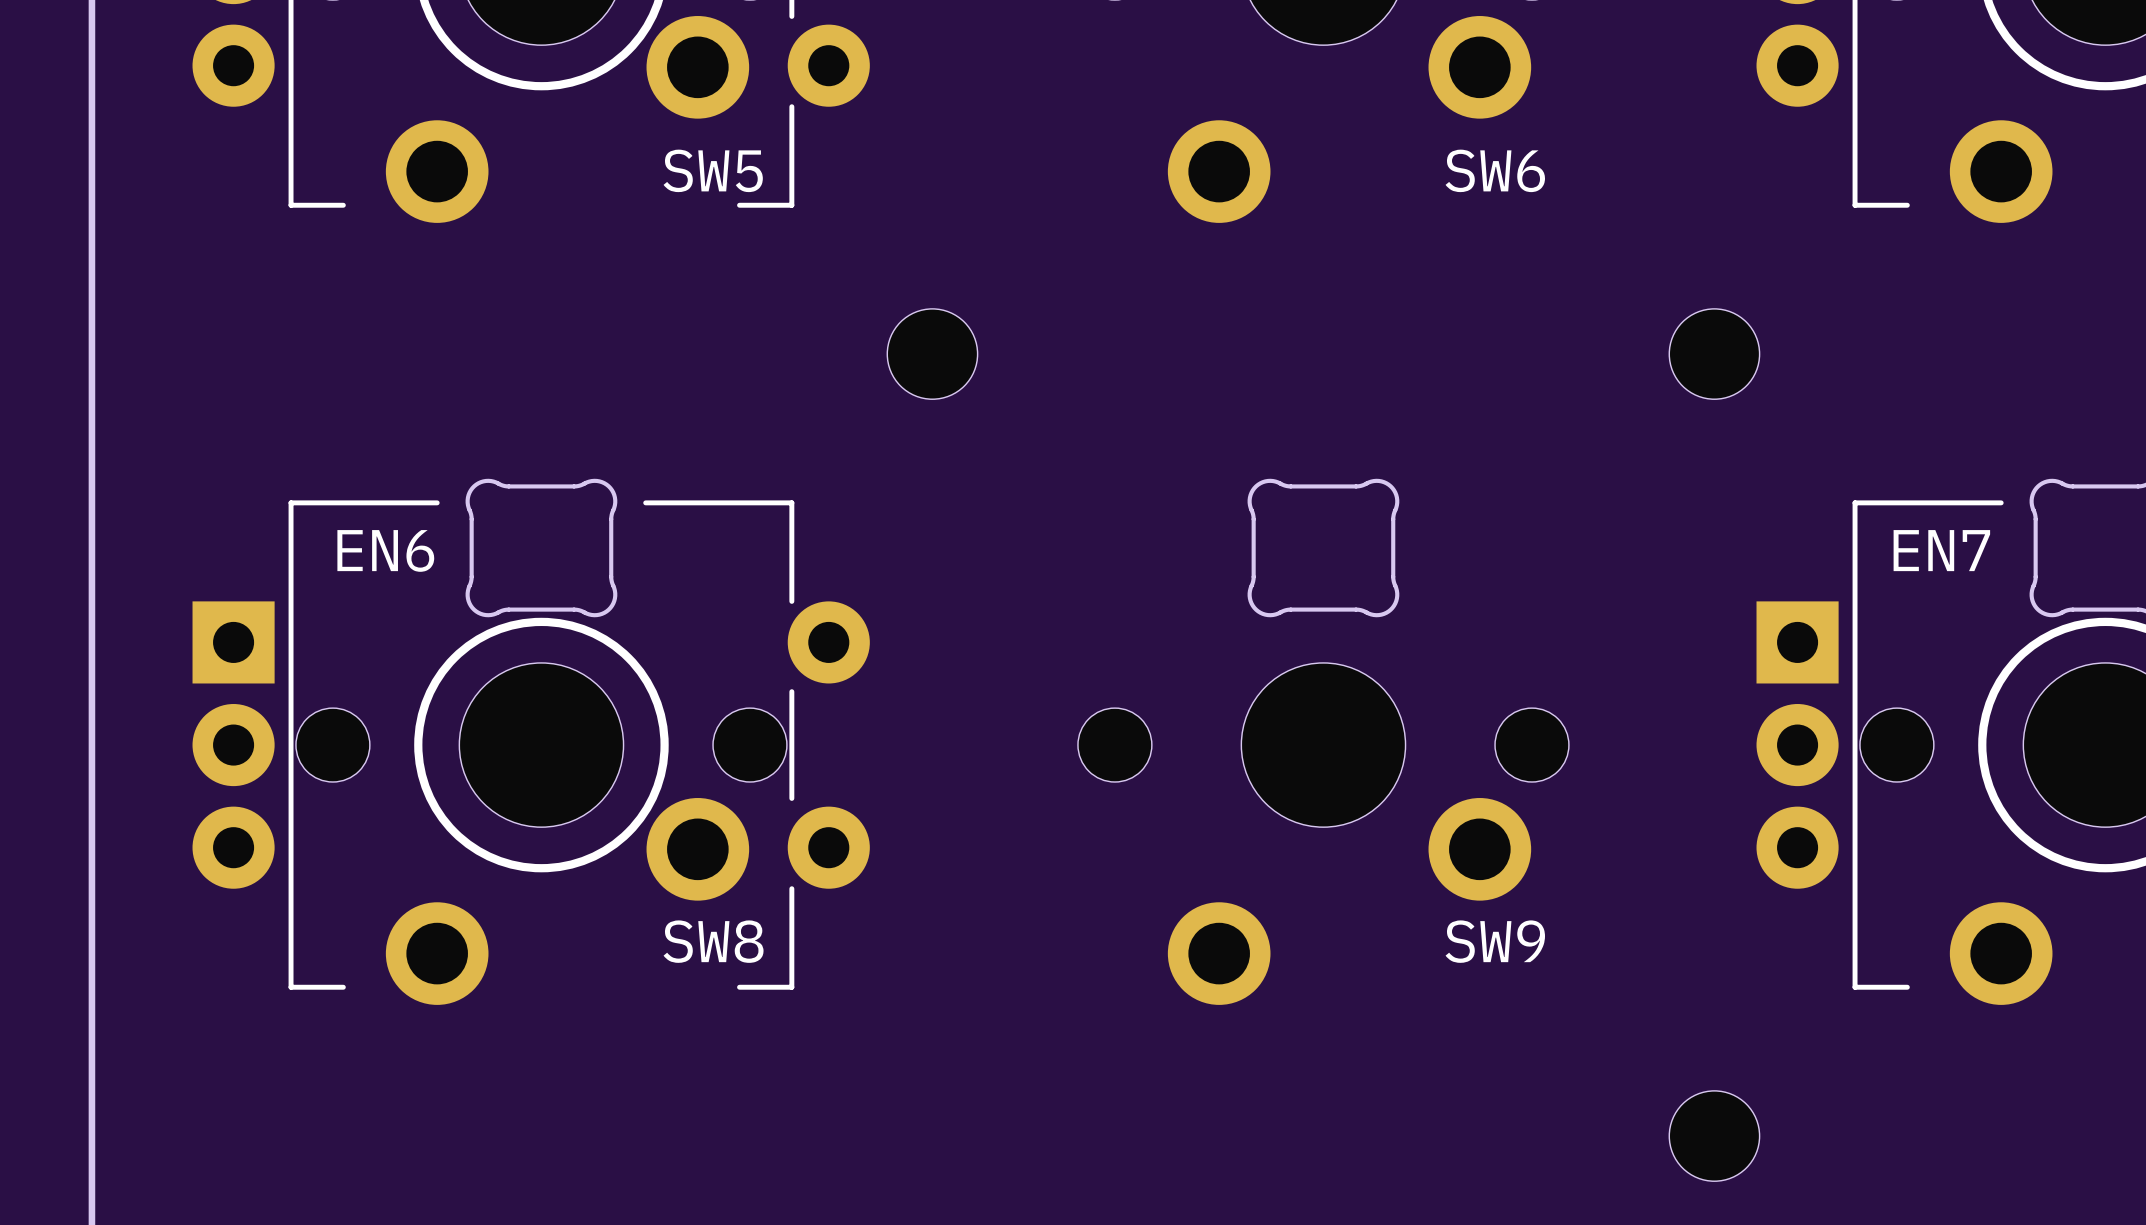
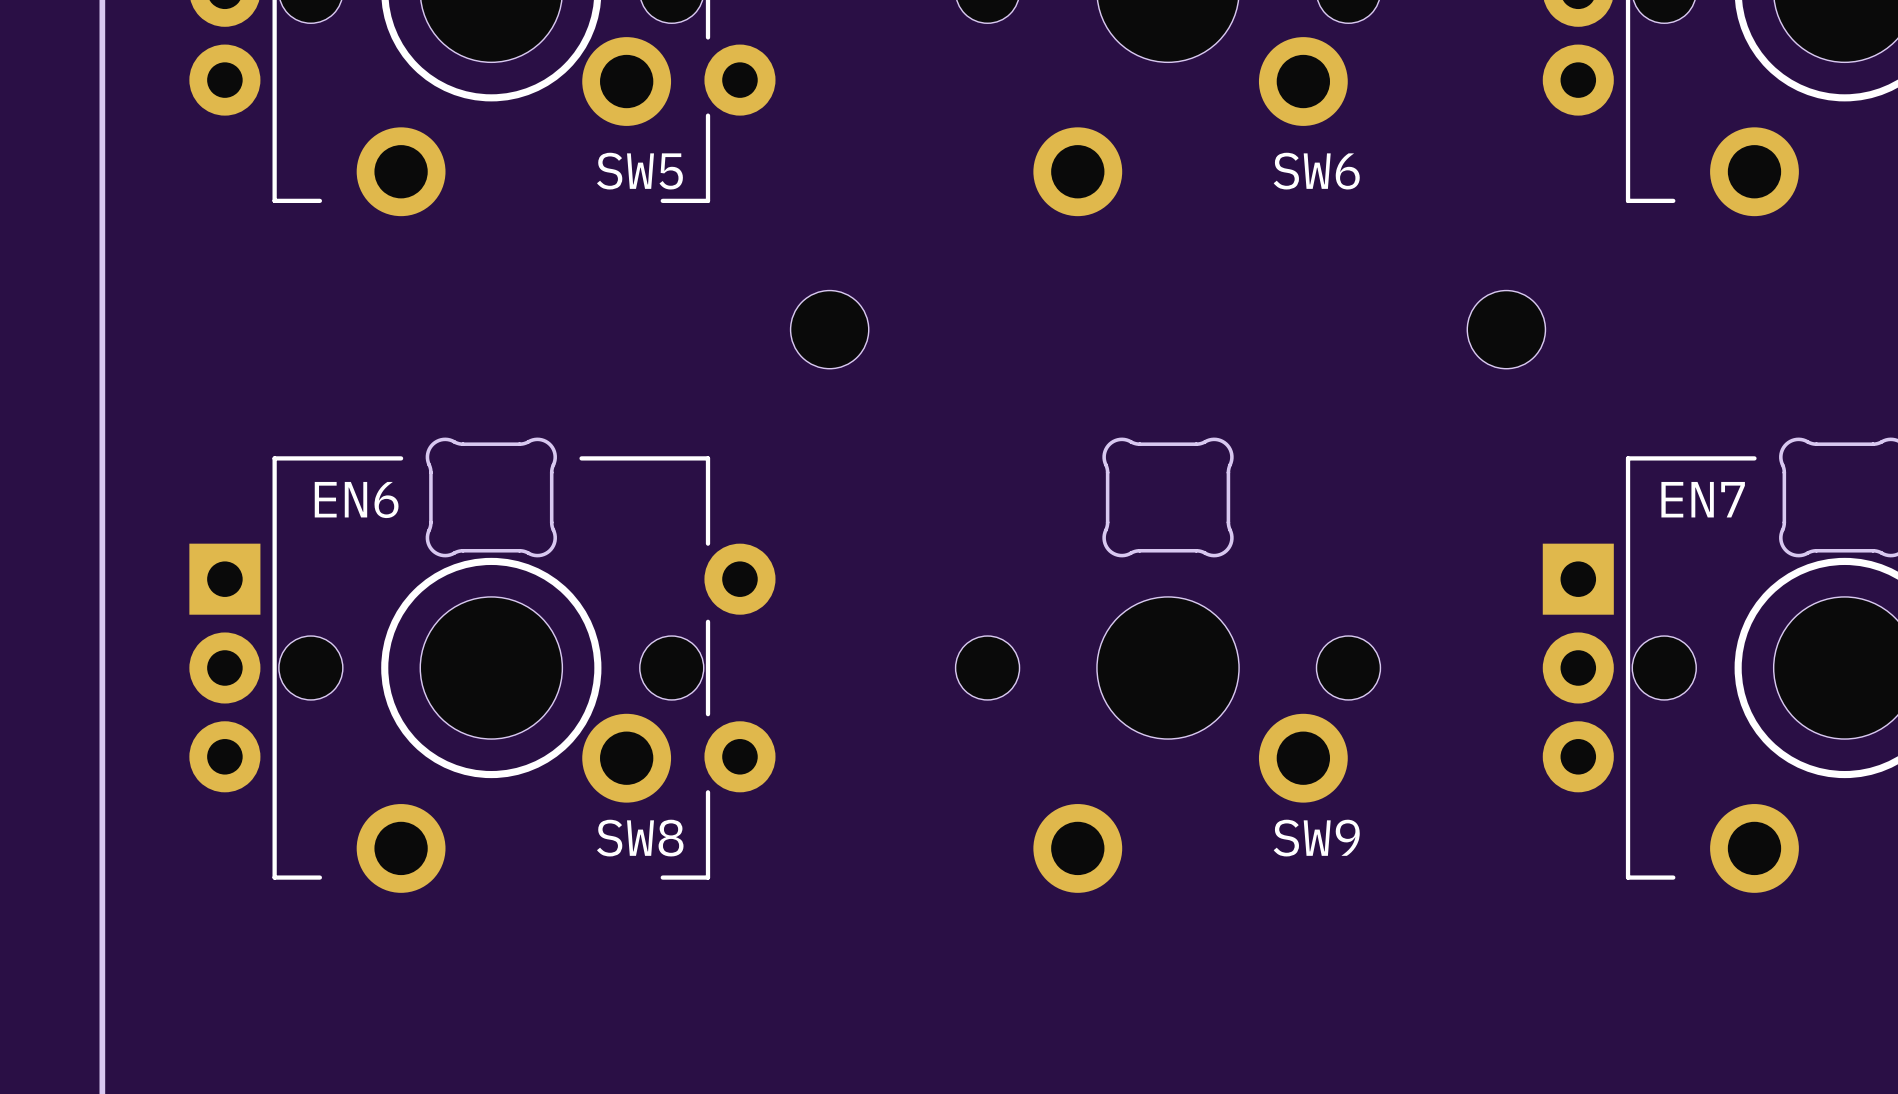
part: (1714, 1136) -> none

